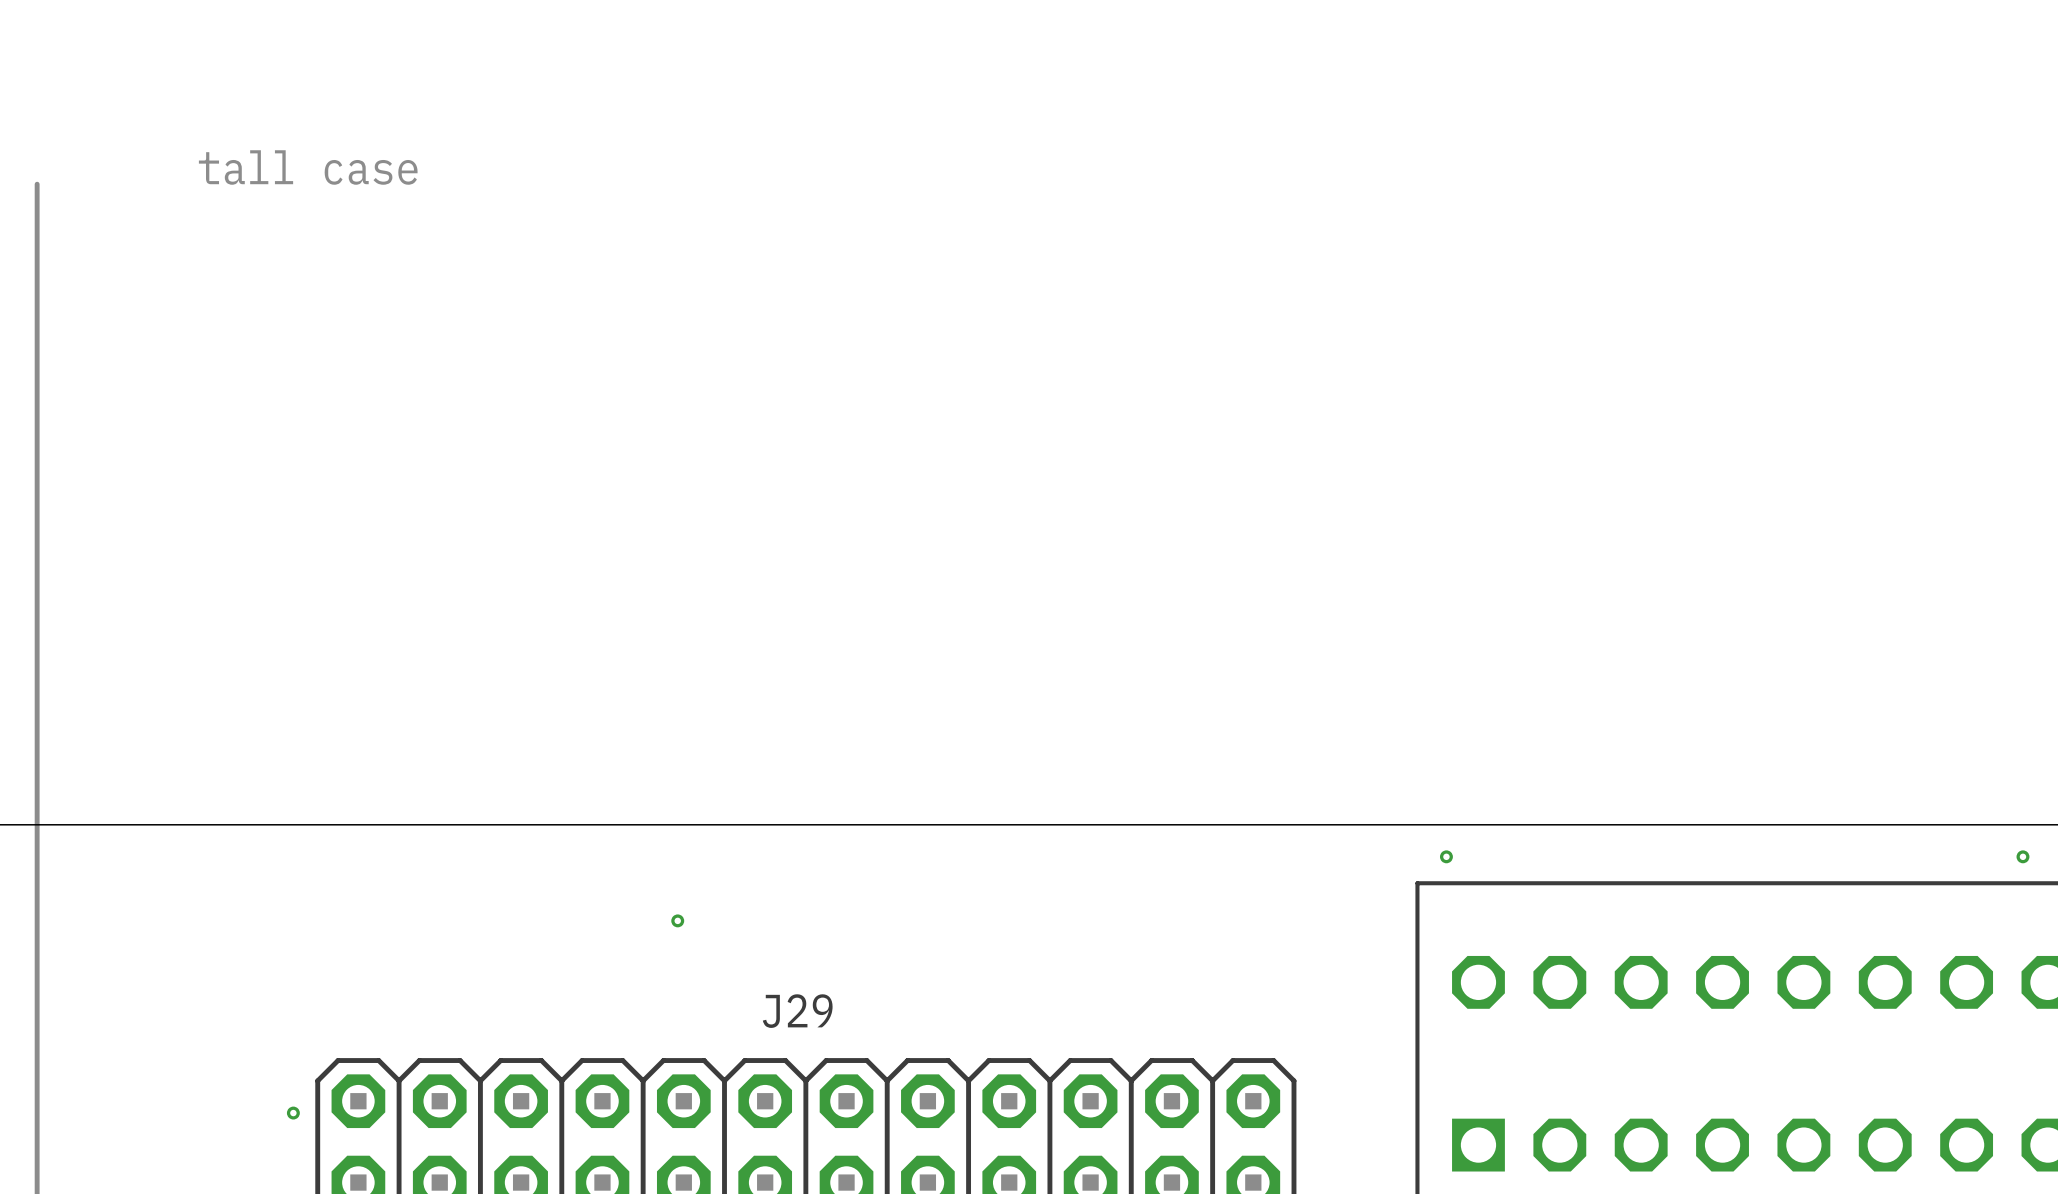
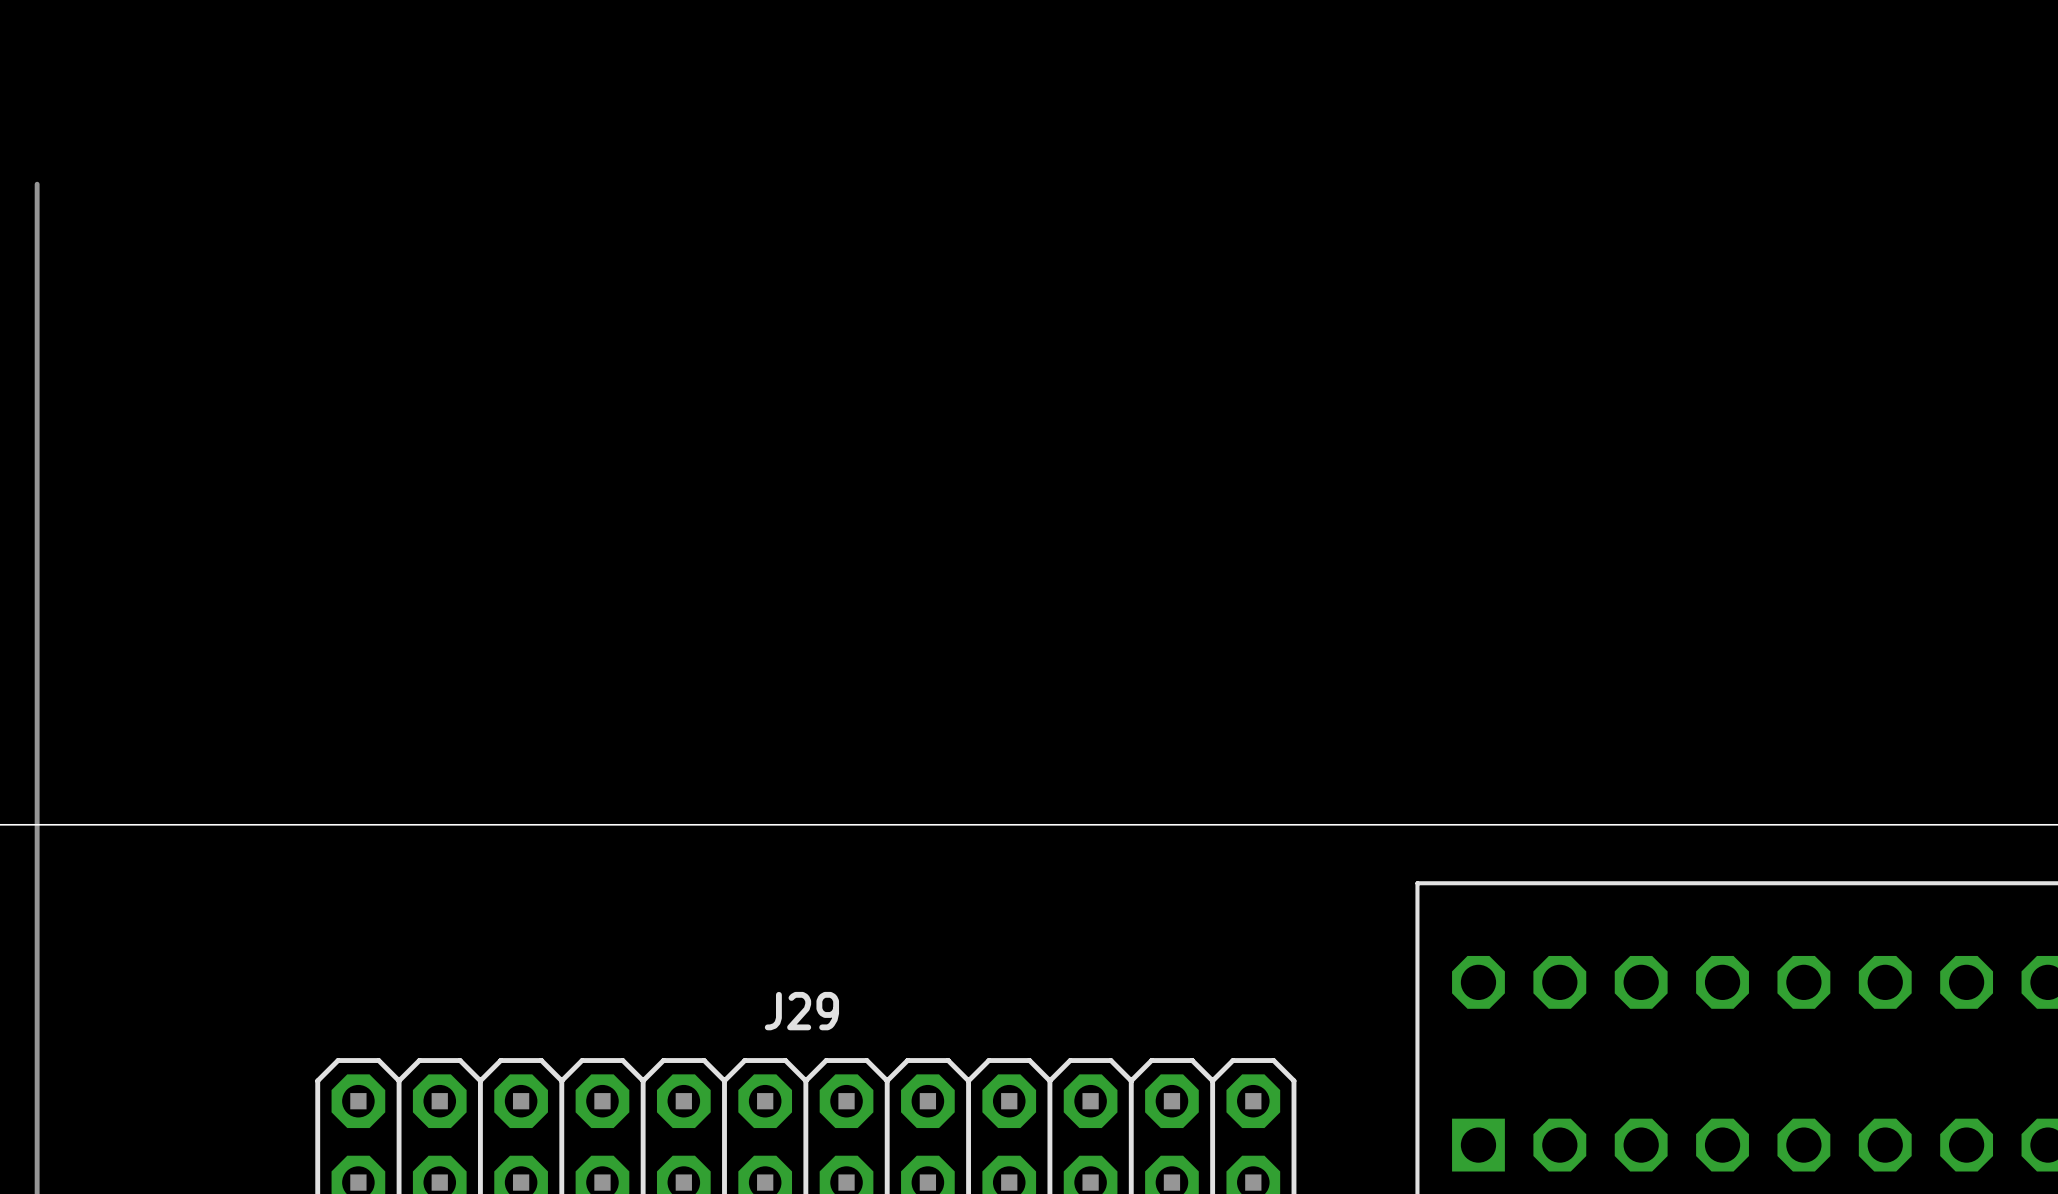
text: tall case (308, 167) -> none
via: (1446, 856) -> none
via: (2022, 856) -> none
via: (677, 920) -> none
via: (293, 1113) -> none

